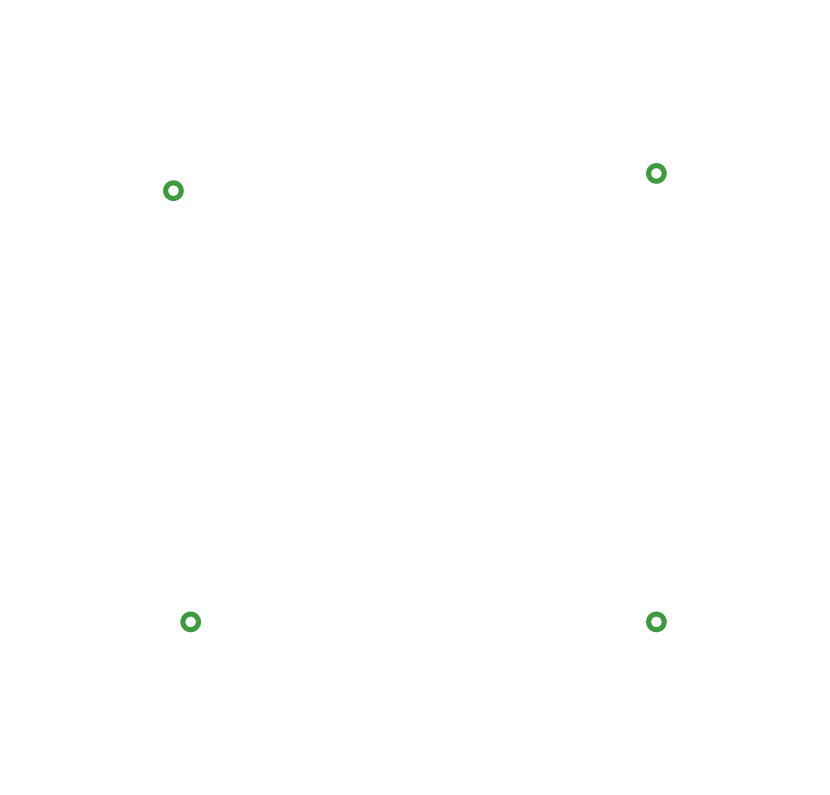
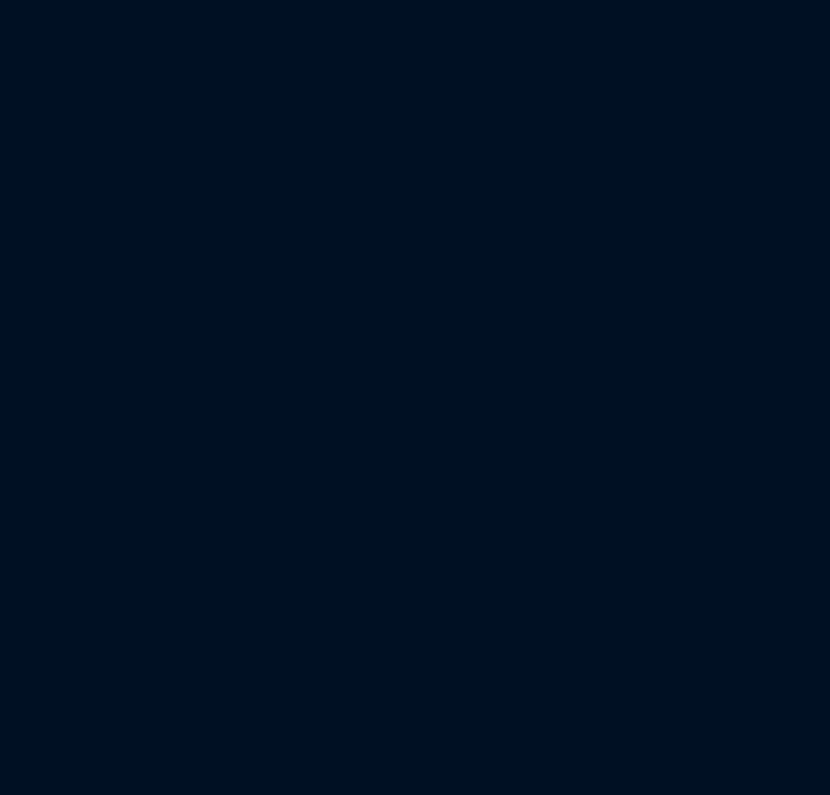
via: (656, 173) -> none
via: (173, 190) -> none
via: (190, 621) -> none
via: (656, 621) -> none

